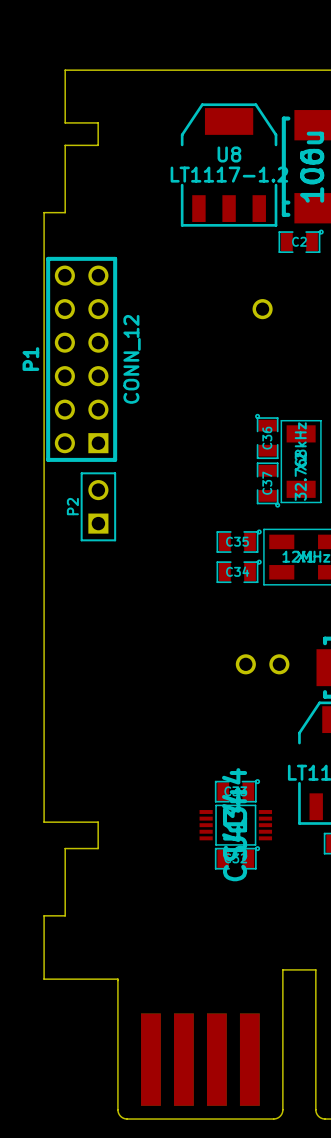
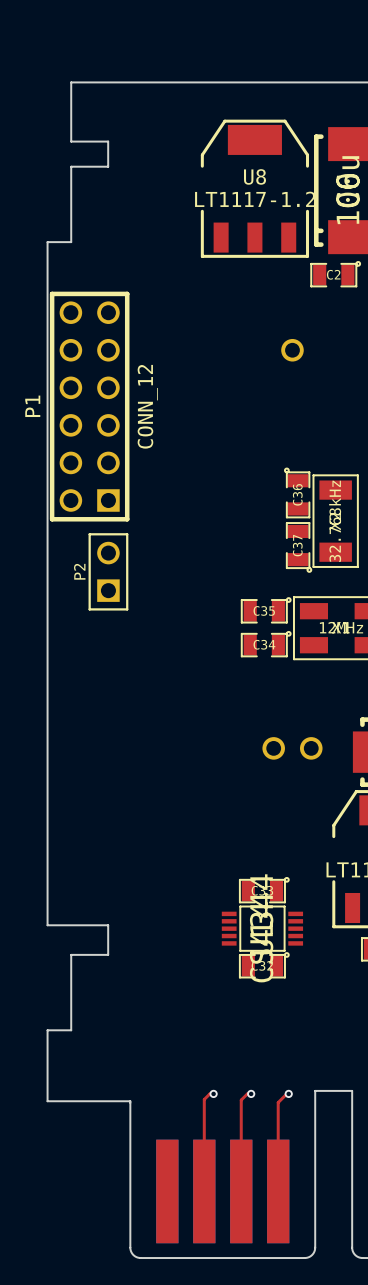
top track: none -> (213, 1093) (209, 1093) (204, 1099) (204, 1191)
via: none -> (213, 1093)
top track: none -> (251, 1093) (247, 1093) (241, 1100) (241, 1191)
via: none -> (251, 1093)
top track: none -> (288, 1093) (278, 1102) (278, 1191)
via: none -> (288, 1093)

